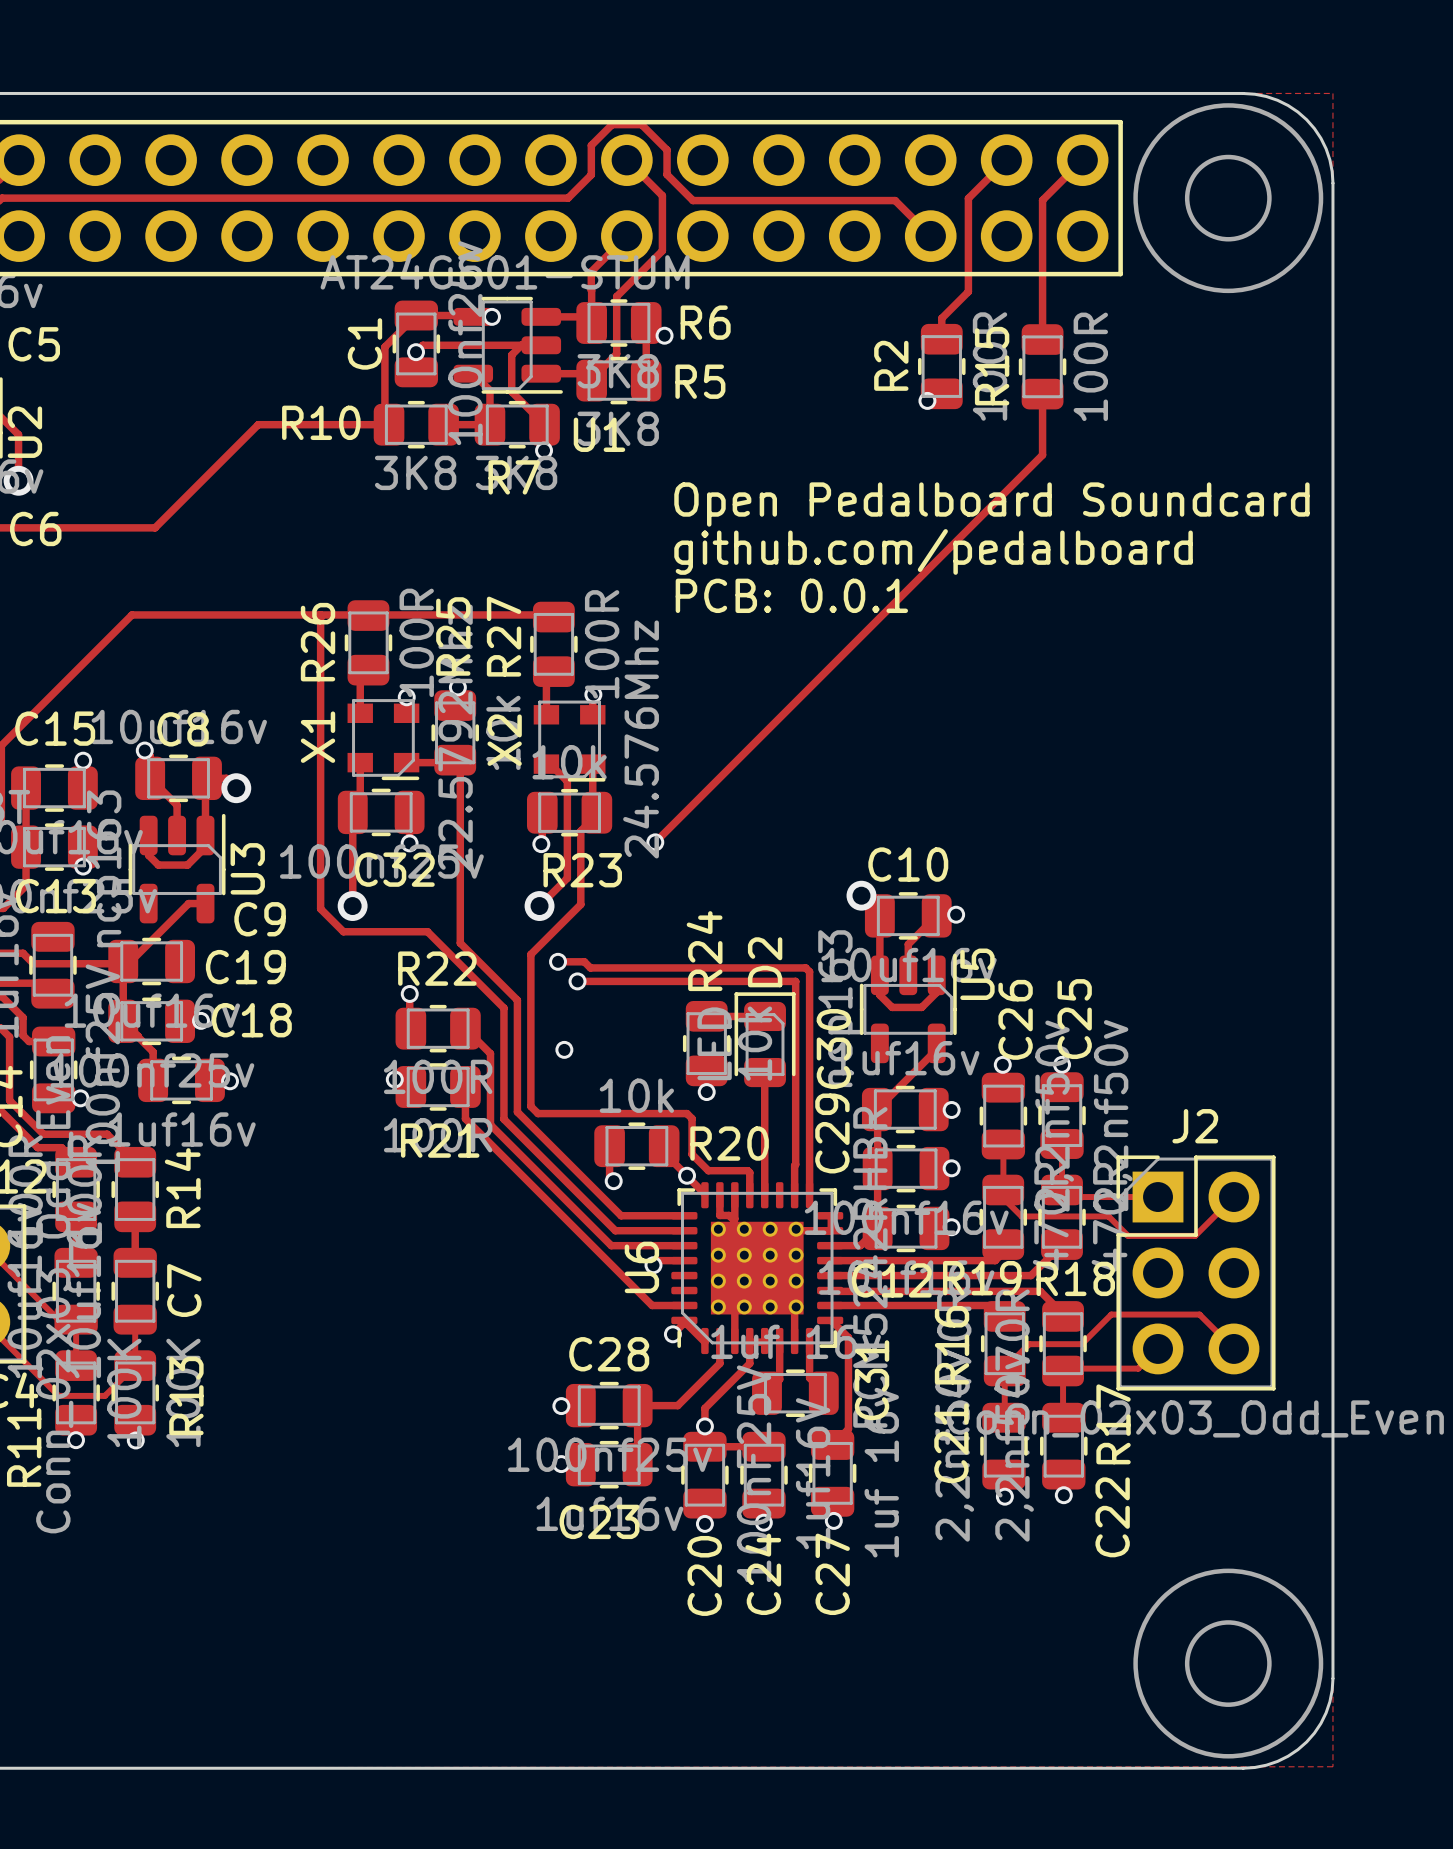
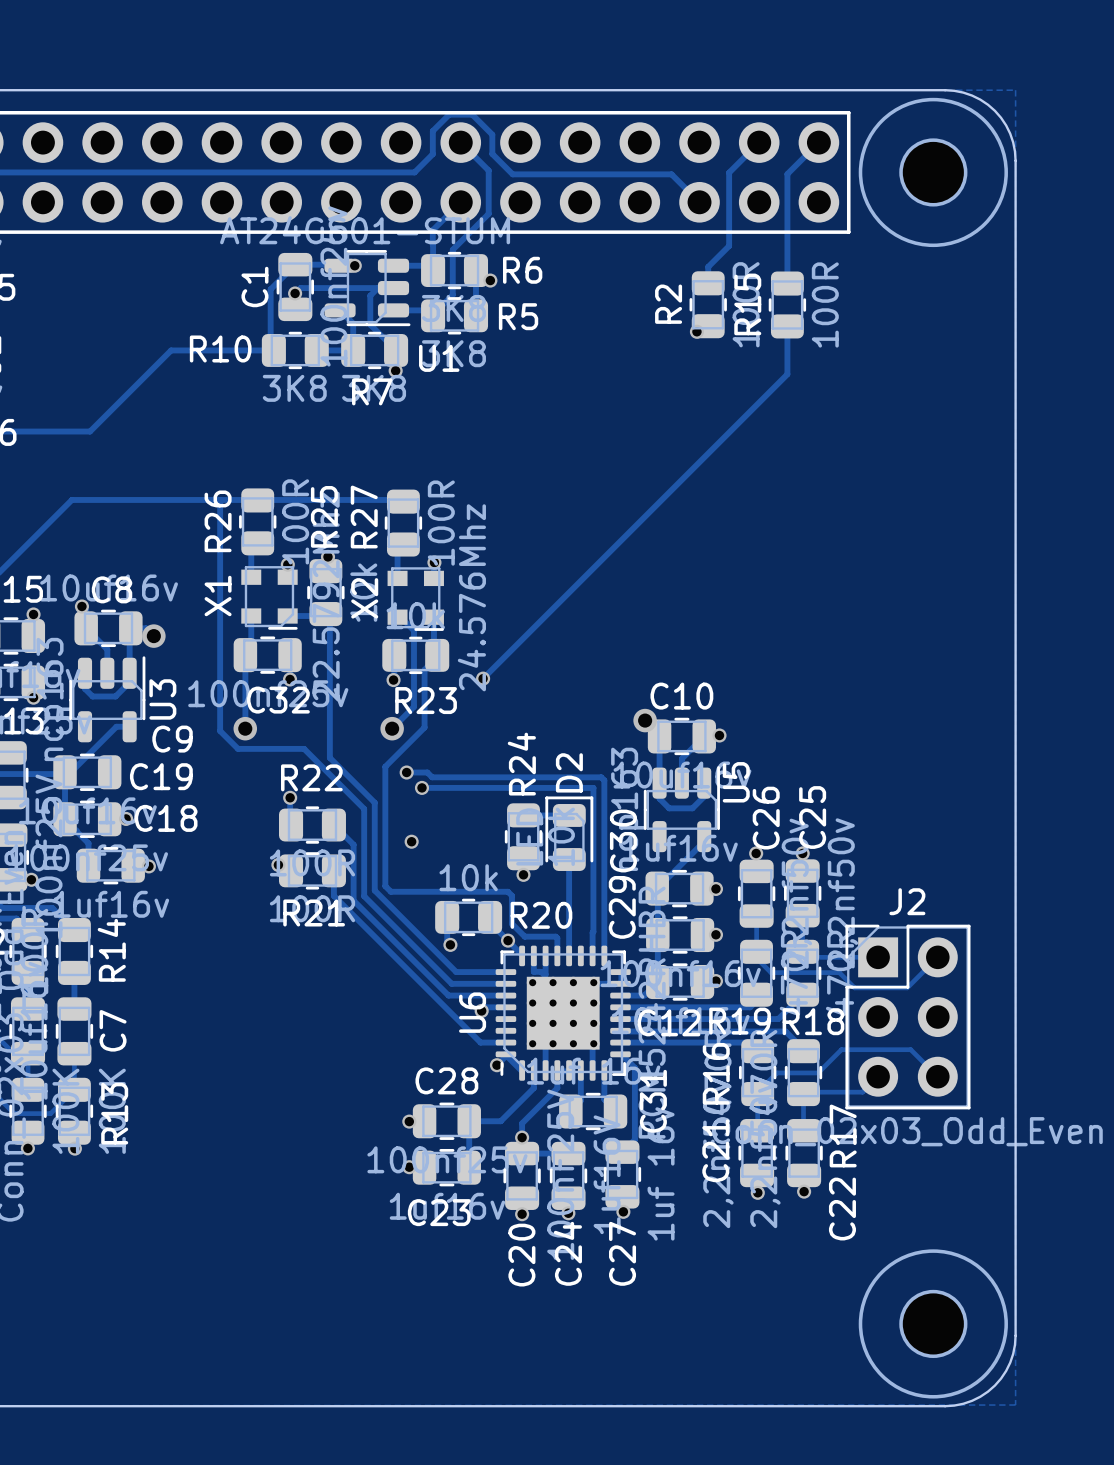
text: Open Pedalboard Soundcard (991, 504) -> none
text: github.com/pedalboard (933, 551) -> none
text: PCB: 0.0.1 (791, 595) -> none

